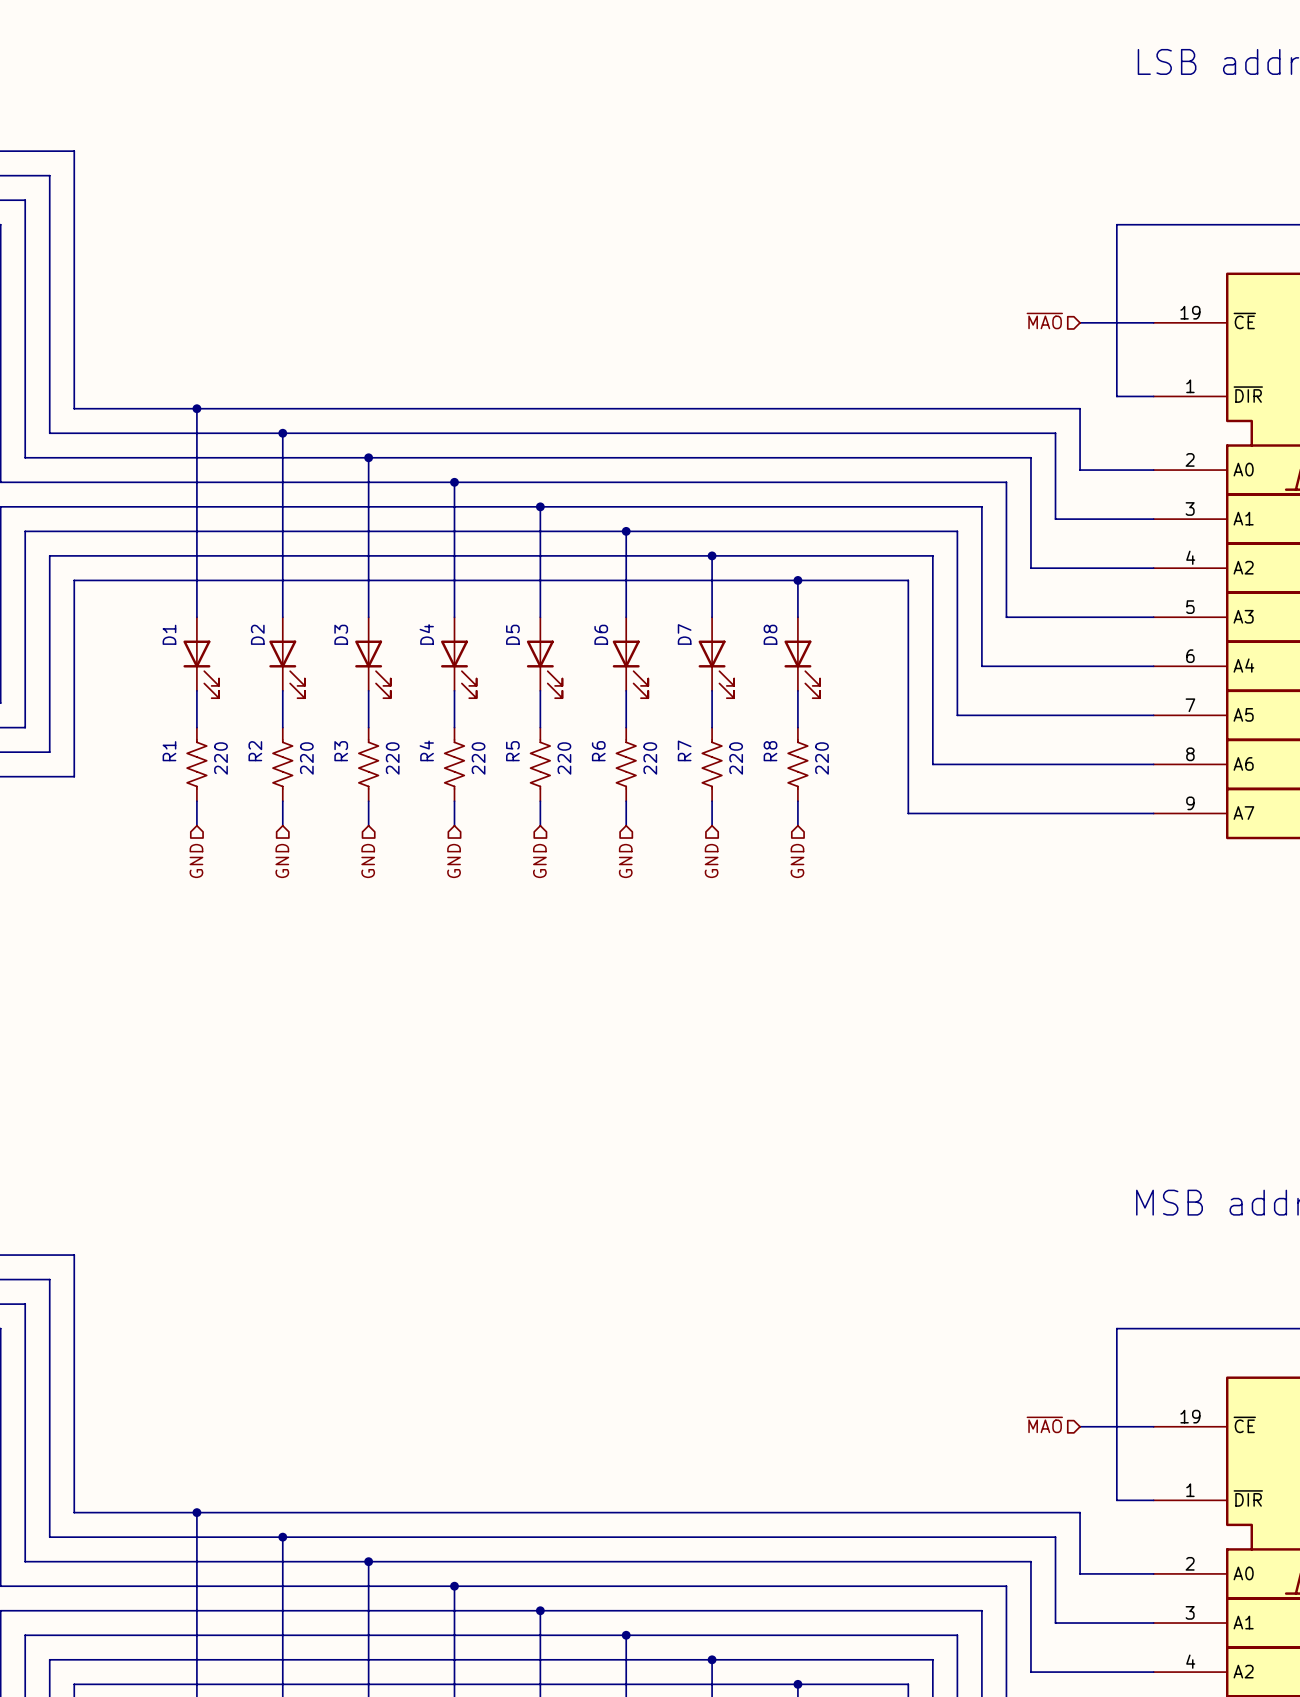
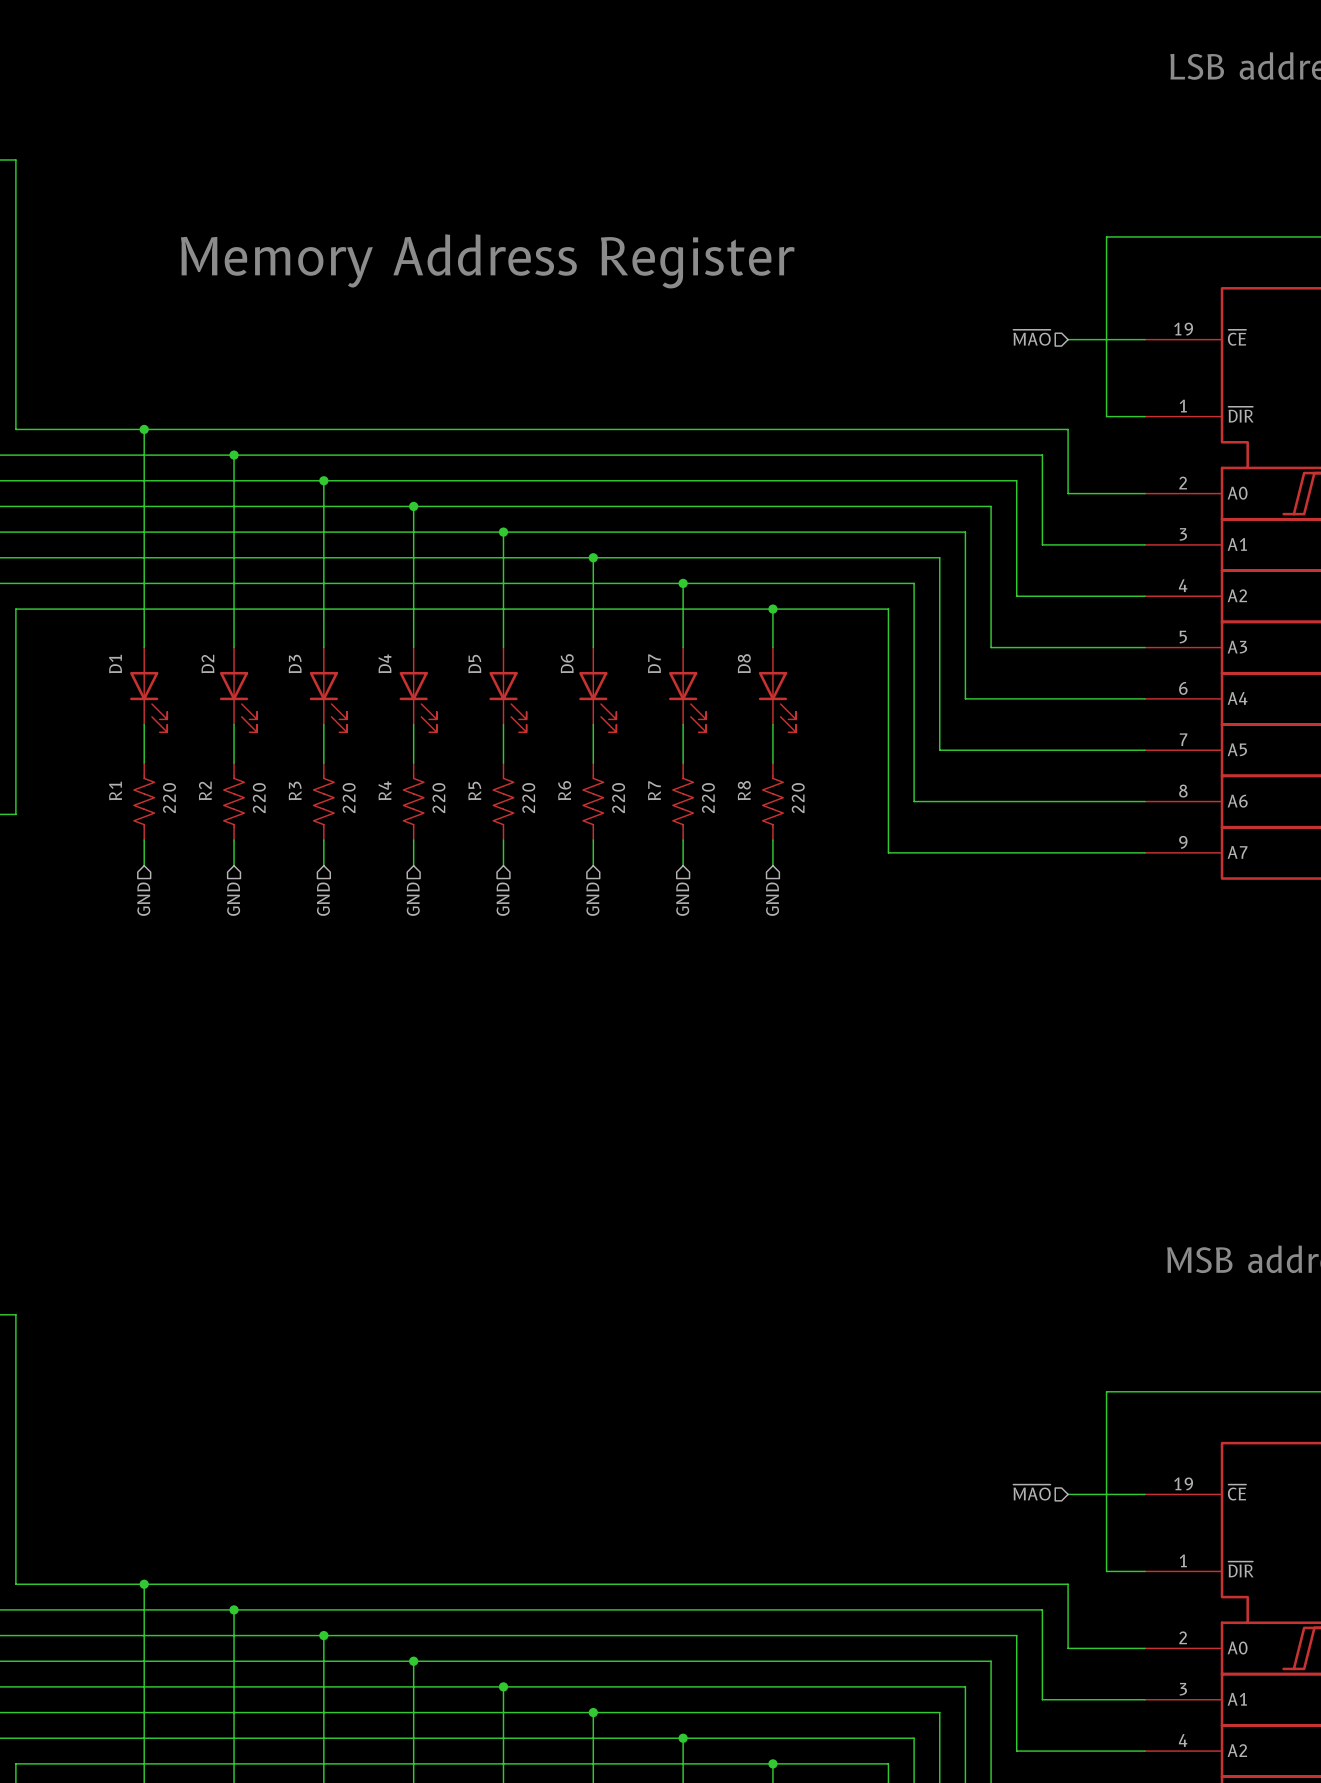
text: none -> Memory Address Register (487, 261)

